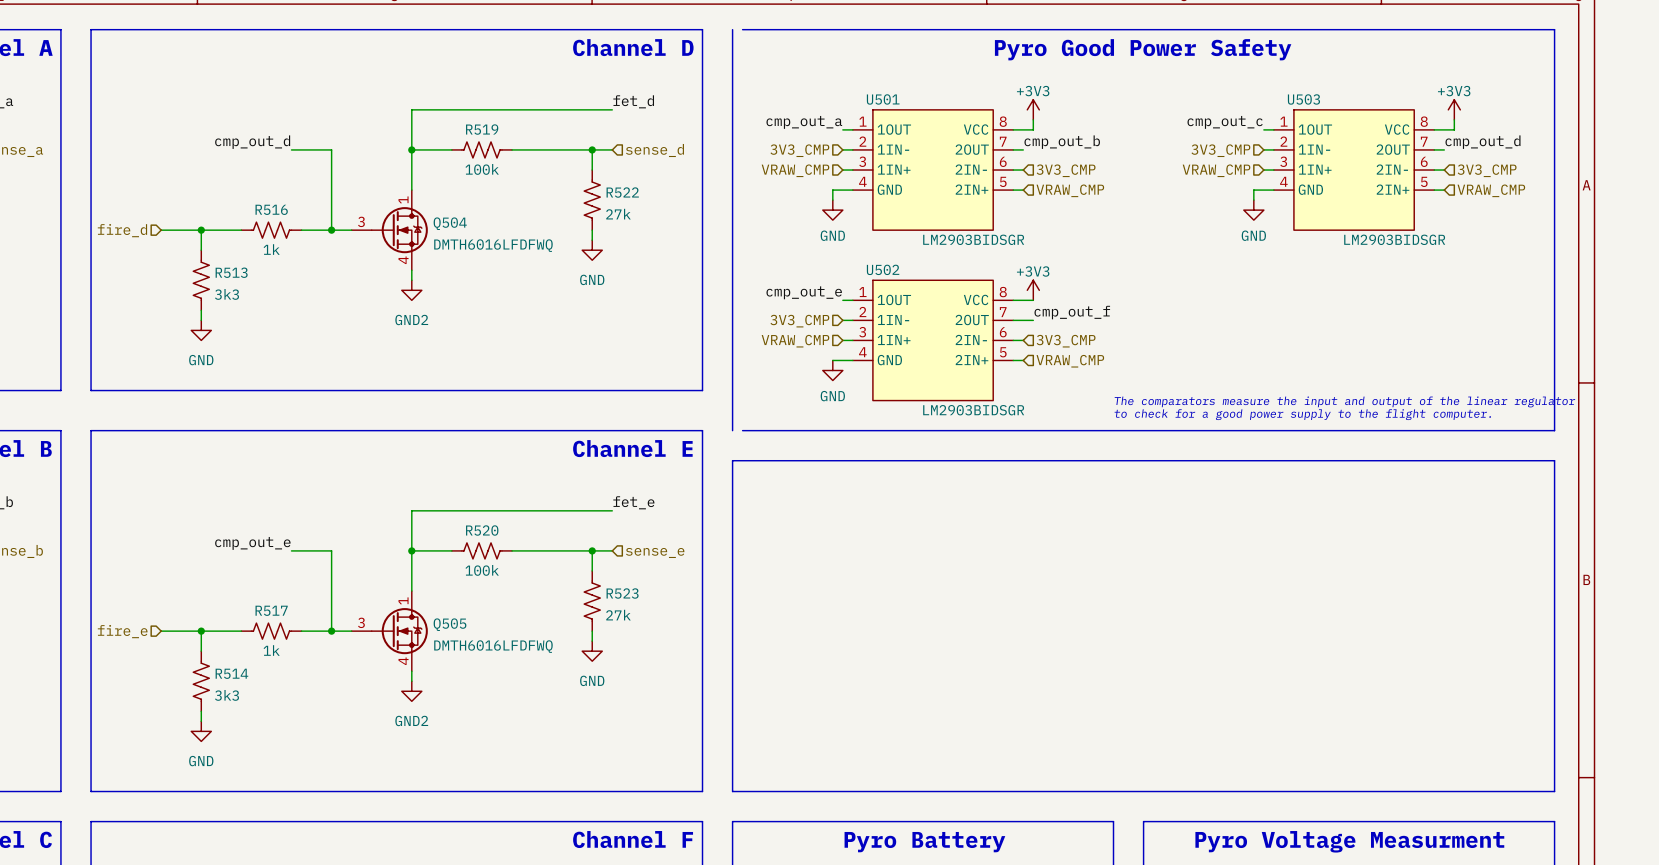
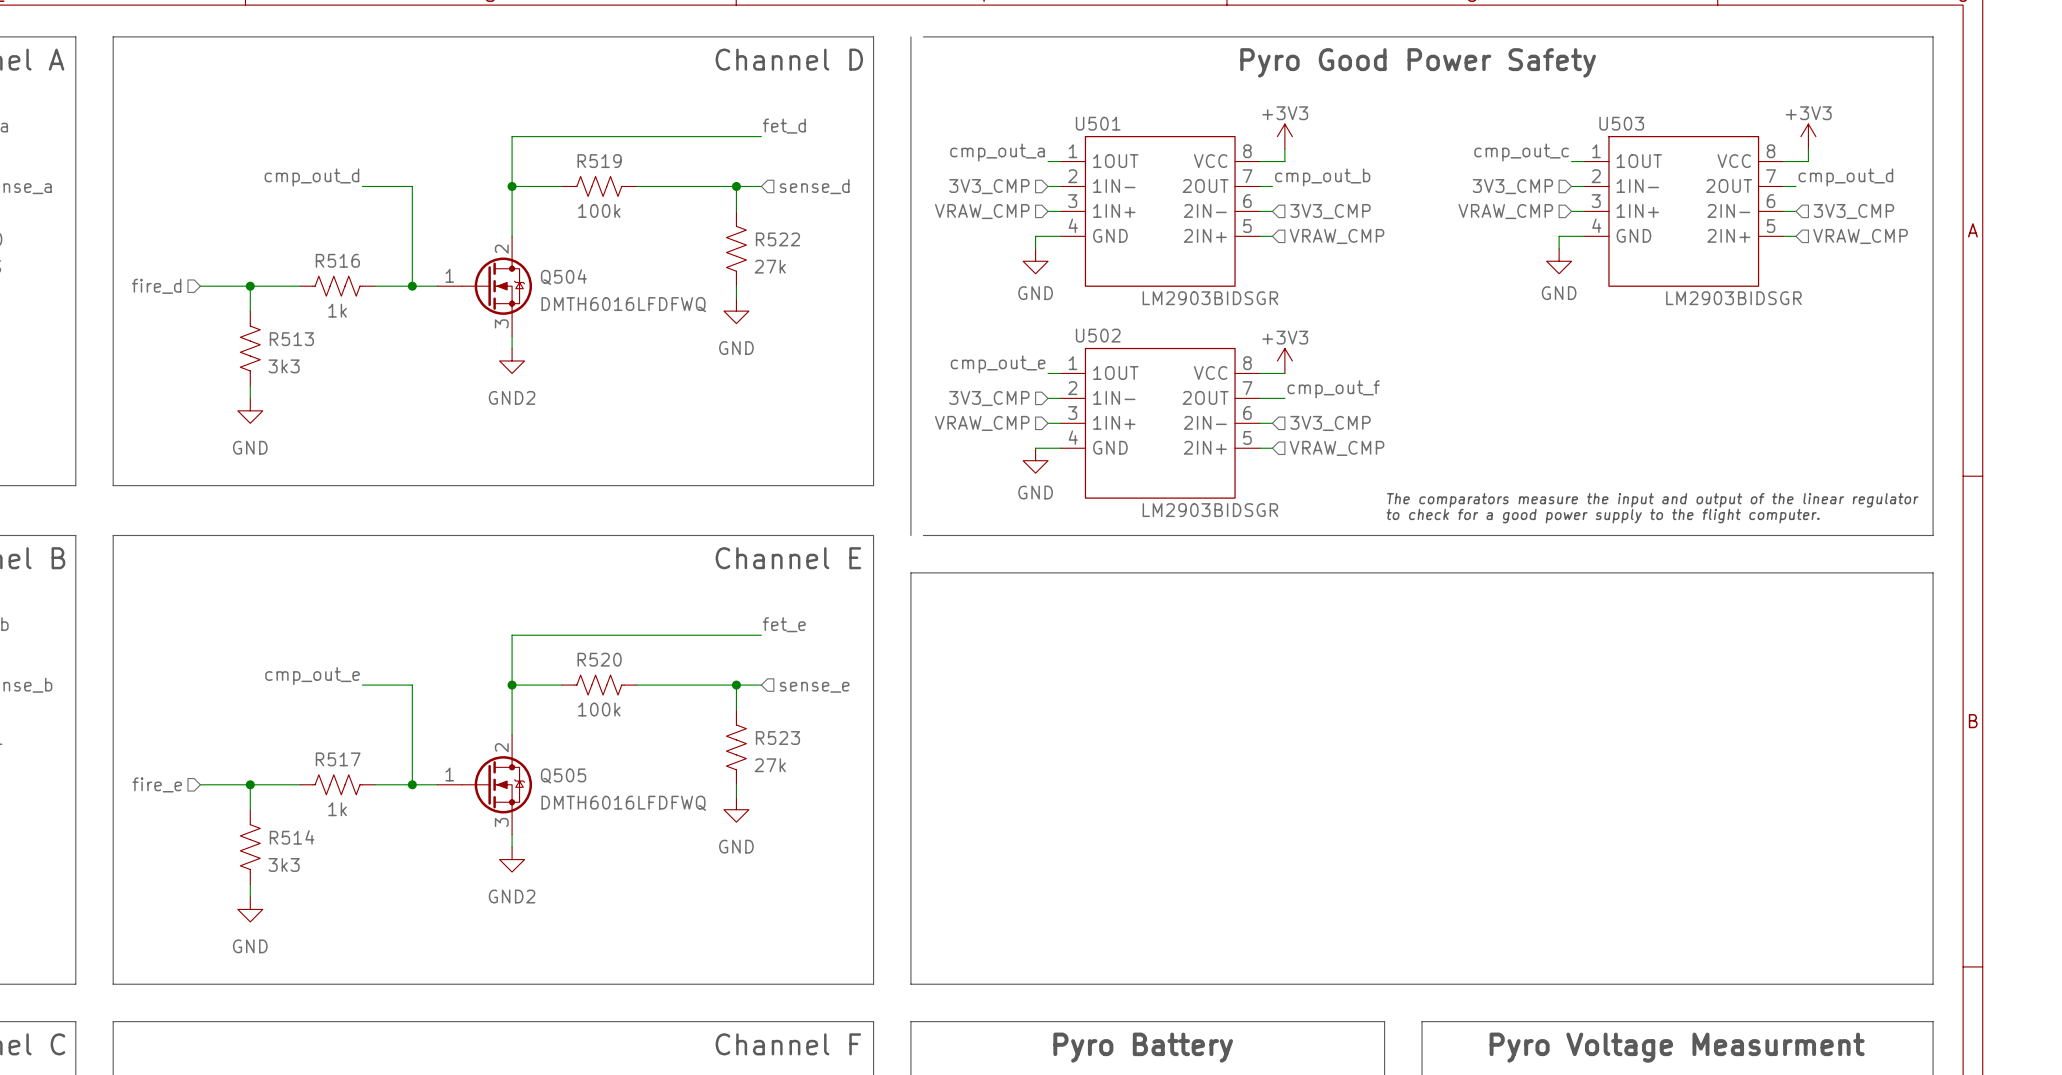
Q504 pin number: 1 (403, 200) -> 2 (501, 249)
Q504 pin number: 3 (361, 221) -> 1 (449, 275)
Q504 pin number: 4 (403, 260) -> 3 (501, 323)
Q505 pin number: 1 (403, 601) -> 2 (501, 747)
Q505 pin number: 3 (361, 622) -> 1 (449, 774)
Q505 pin number: 4 (403, 661) -> 3 (501, 822)

